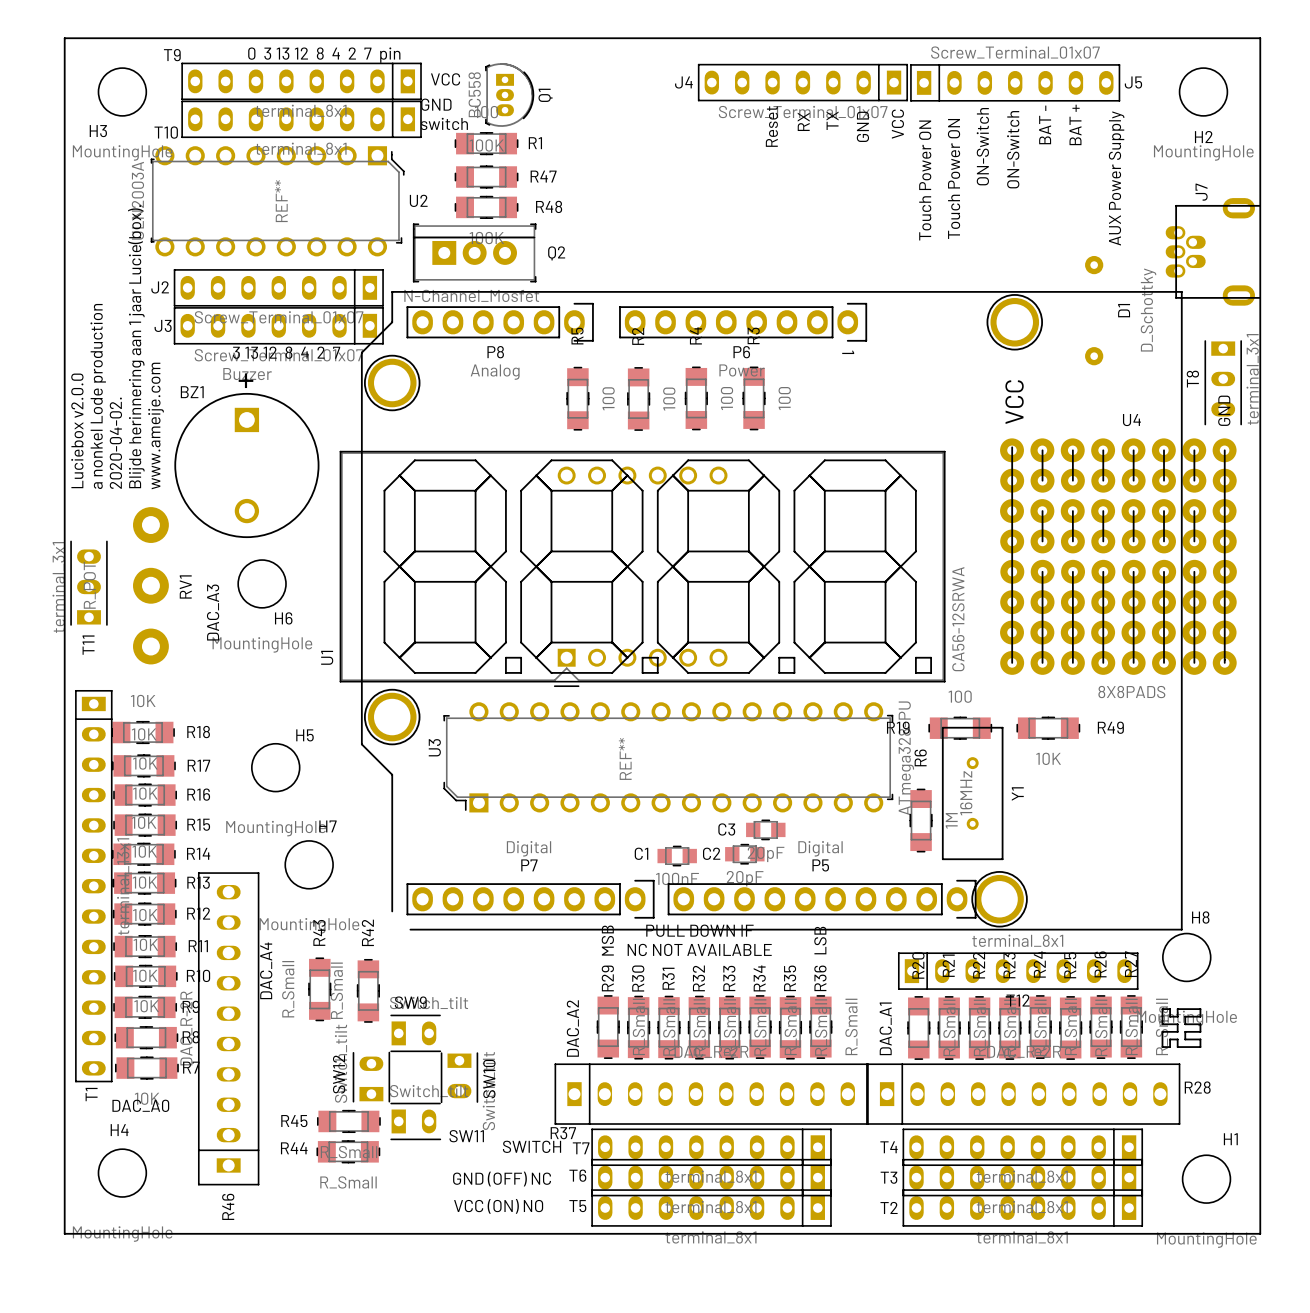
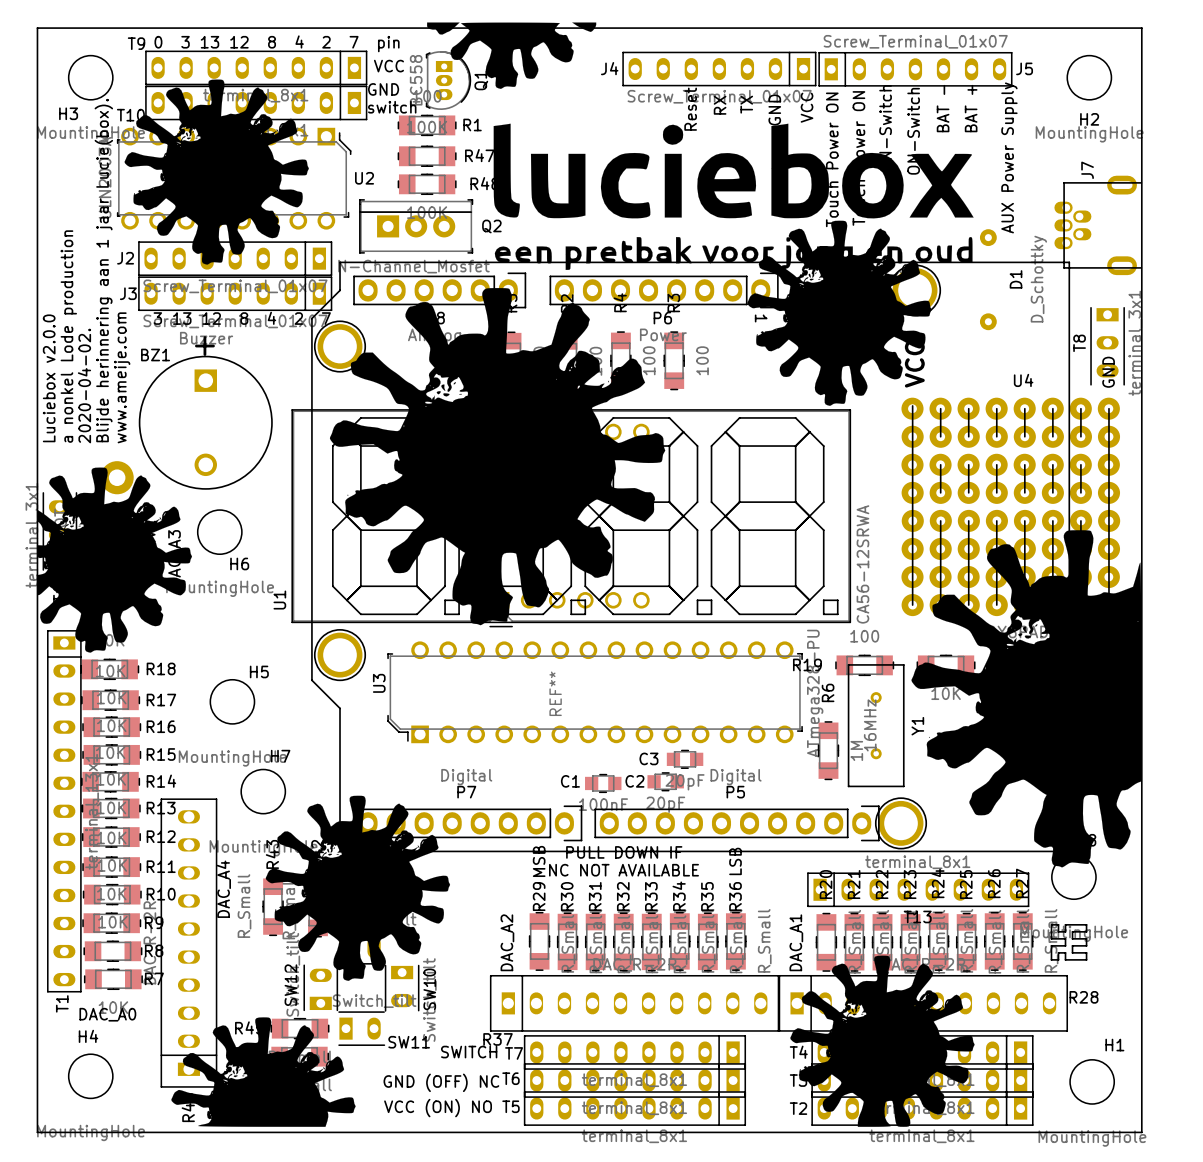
drawing: none -> [36, 22, 1142, 1127]
T12 name: T12 (1018, 1000) -> T13 (917, 916)

